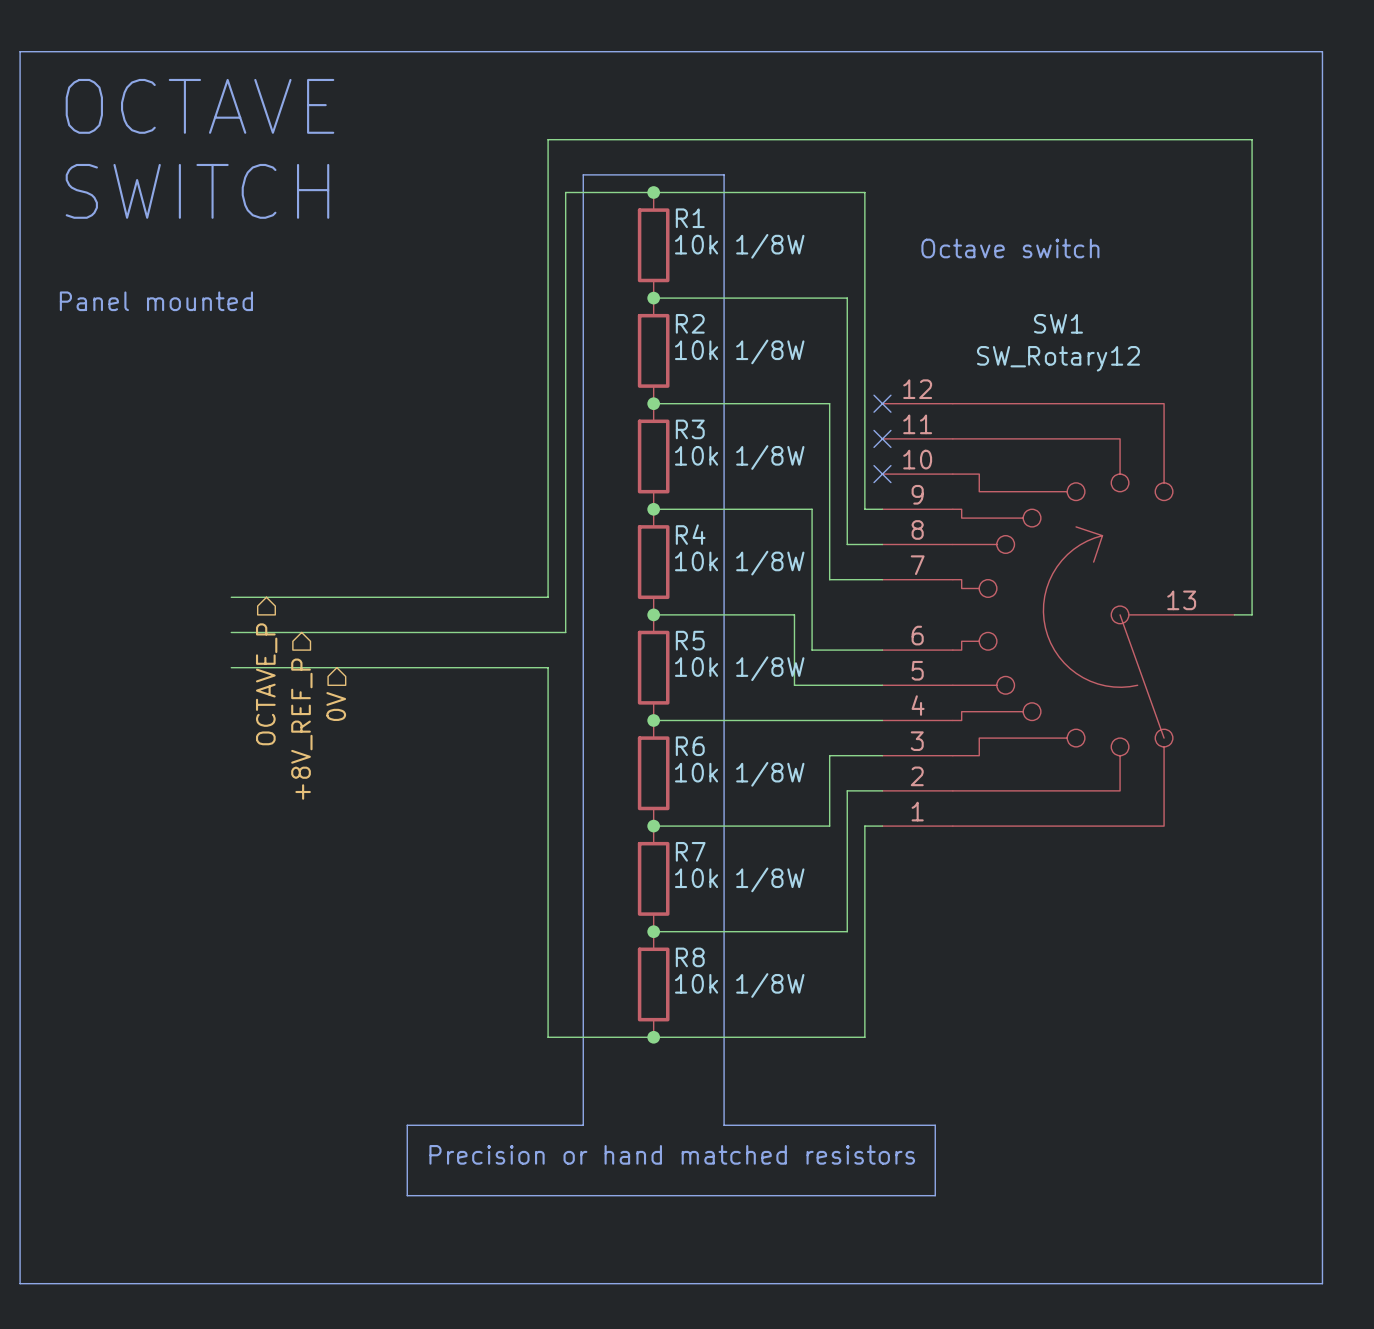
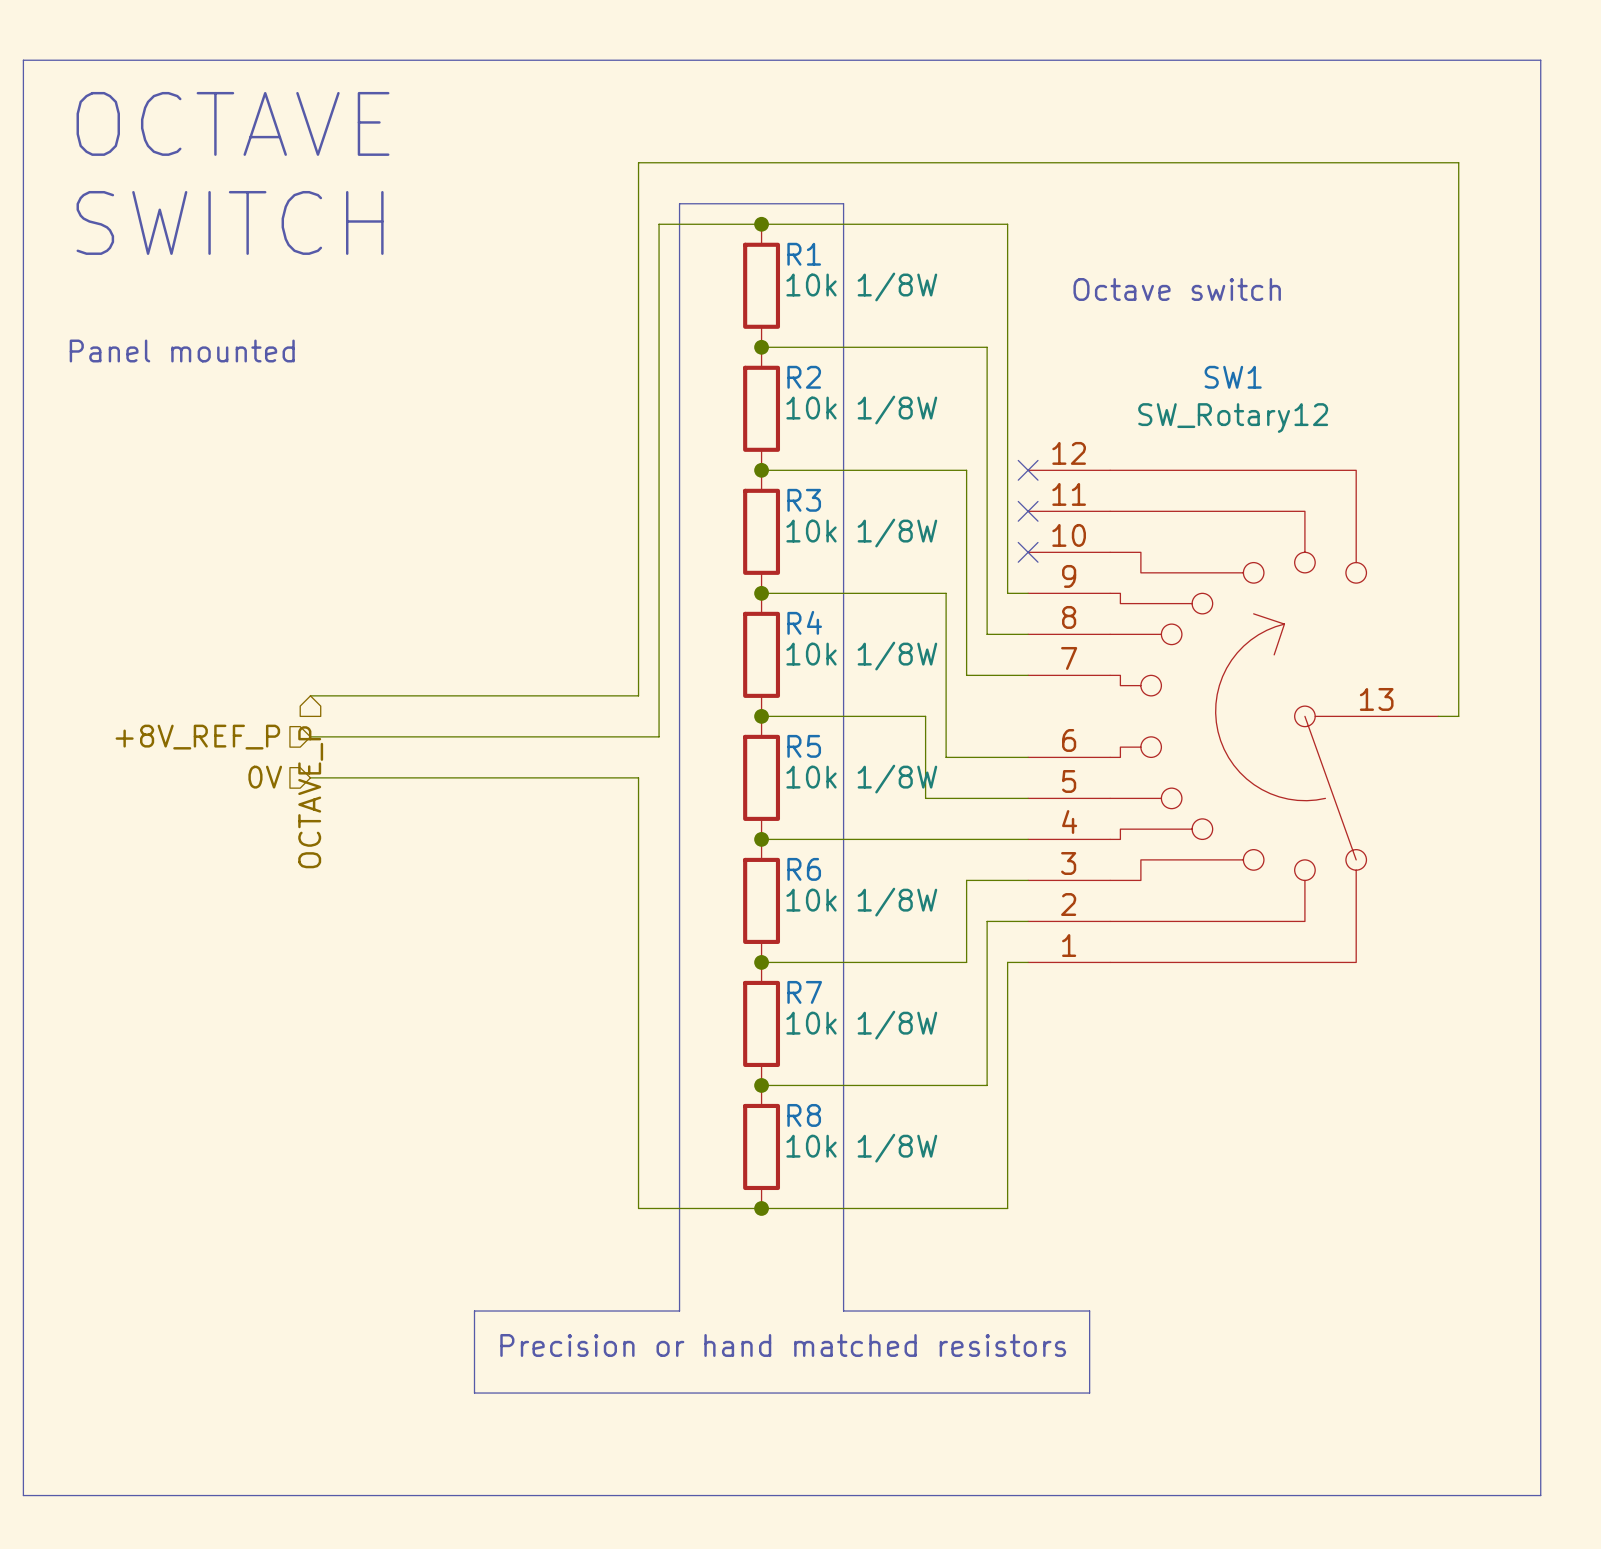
wire: (231, 597) (266, 597) -> none
wire: (231, 632) (266, 632) -> none
wire: (231, 667) (266, 667) -> none
hierarchical label rotation: 0° (336, 706) -> 90° clockwise (265, 777)
hierarchical label position: 0V (336, 706) -> 0V (265, 777)
hierarchical label rotation: 0° (301, 729) -> 90° clockwise (197, 737)
hierarchical label position: +8V_REF_P (301, 729) -> +8V_REF_P (197, 737)

